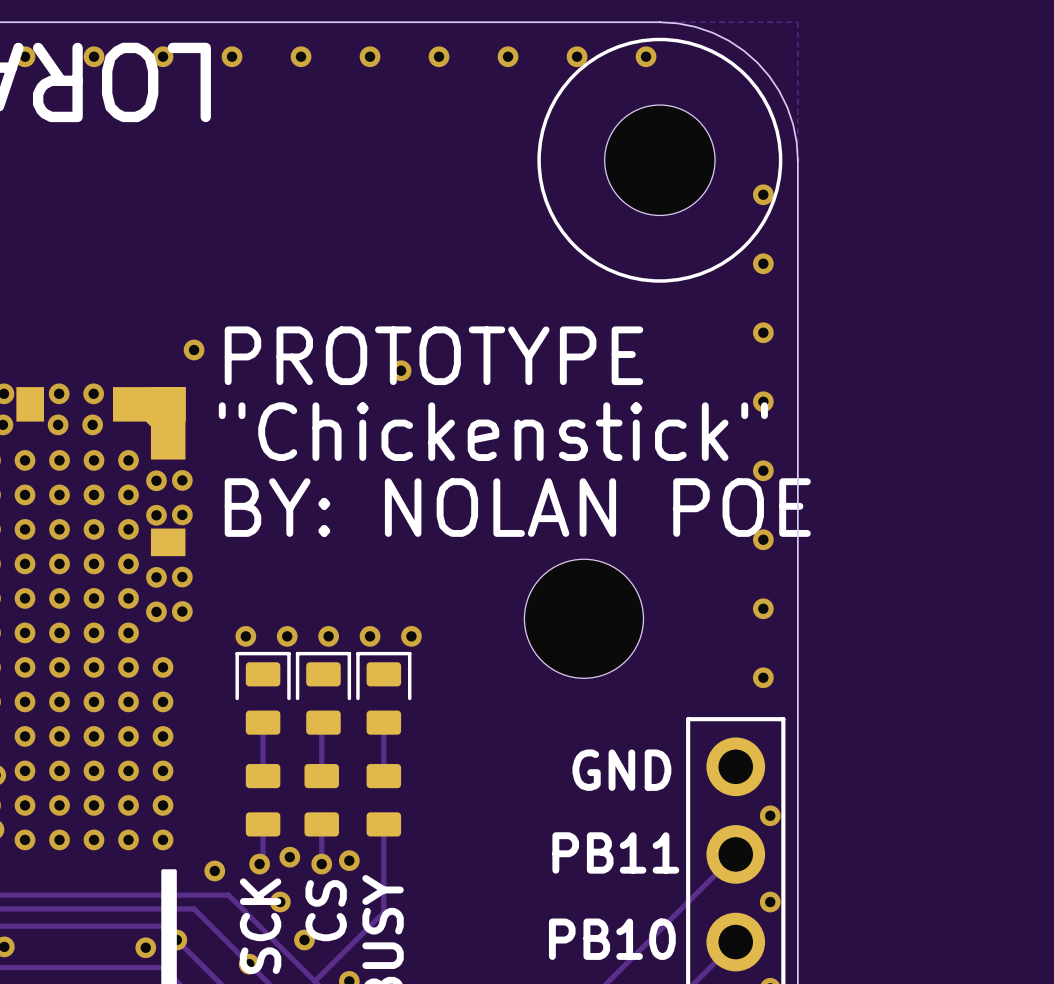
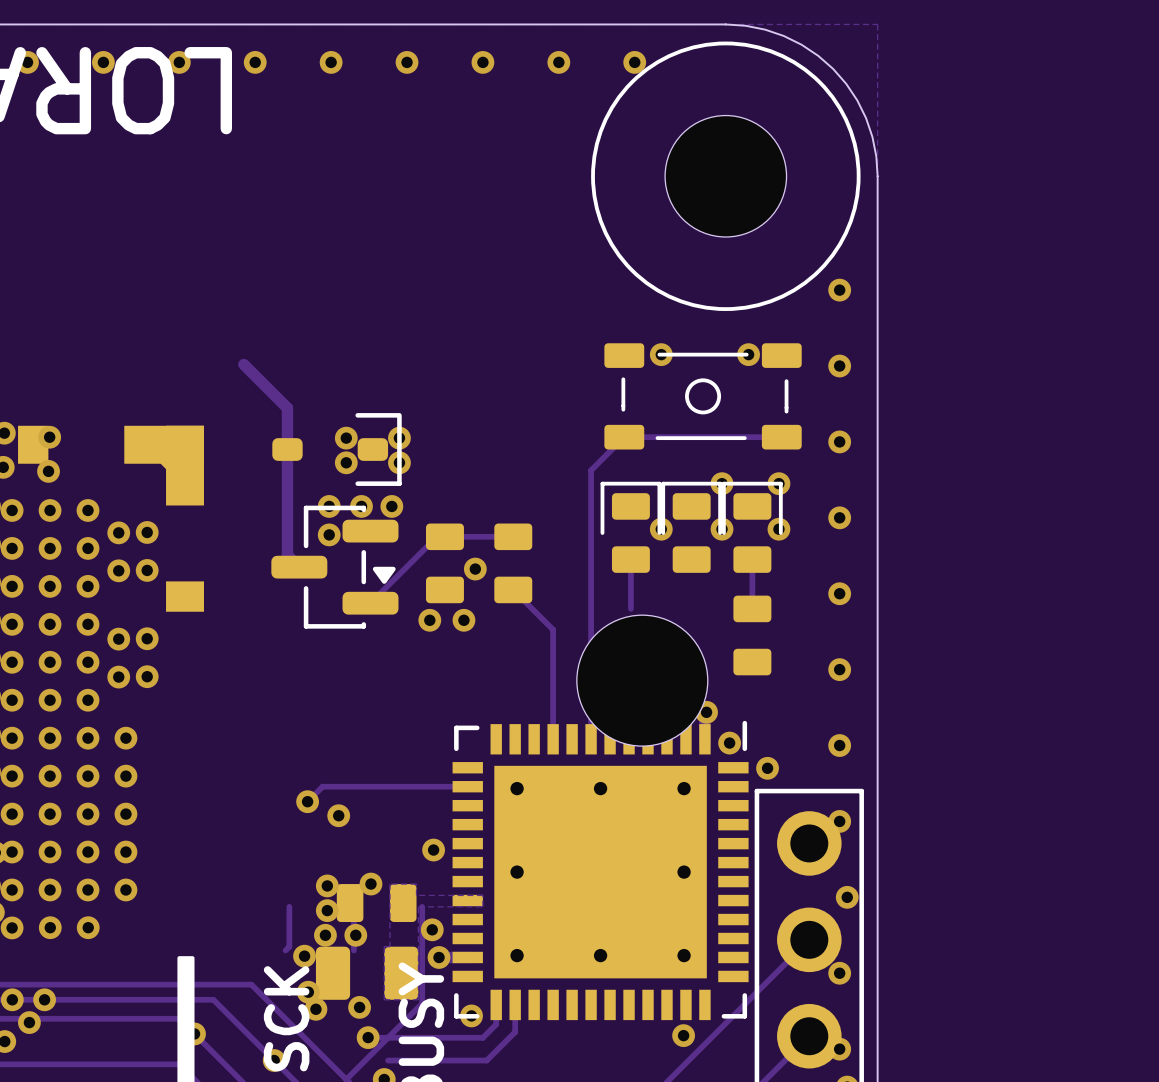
via: (646, 56) -> none
via: (763, 194) -> none
via: none -> (661, 354)
via: none -> (748, 354)
track: none -> (243, 364) (287, 408) (287, 555) (299, 567)
via: (194, 350) -> none
text: PROTOTYPE (433, 355) -> none
part: none -> (703, 396)
via: (401, 370) -> none
via position: (59, 393) -> (49, 437)
via: (93, 393) -> none
track: none -> (781, 437) (624, 437) (591, 470) (591, 744)
via: none -> (346, 438)
via: none -> (399, 438)
part: none -> (337, 449)
via: none -> (346, 462)
via: none -> (399, 462)
via position: (58, 424) -> (48, 471)
via: (92, 424) -> none
text: "Chickenstick" (493, 431) -> none
via: none -> (722, 483)
via: none -> (778, 483)
via: (25, 460) -> none
via: (59, 460) -> none
via: (94, 460) -> none
via: (128, 460) -> none
via: none -> (329, 506)
via: none -> (361, 506)
via: none -> (391, 506)
via: none -> (12, 510)
via: none -> (50, 510)
via: none -> (88, 510)
part: none -> (630, 527)
part: none -> (691, 527)
part: none -> (752, 527)
via: (156, 480) -> none
via: (182, 480) -> none
via: none -> (661, 529)
via: none -> (722, 529)
via: none -> (778, 529)
via: none -> (118, 532)
via: none -> (147, 532)
via: none -> (329, 534)
track: none -> (513, 536) (436, 536) (370, 603)
via: (25, 494) -> none
via: (59, 494) -> none
via: (94, 494) -> none
via: (128, 494) -> none
via: none -> (12, 548)
via: none -> (50, 548)
via: none -> (88, 548)
text: BY: NOLAN POE (517, 507) -> none
track: none -> (630, 559) (630, 608)
track: none -> (752, 559) (752, 608)
part: none -> (444, 563)
part: none -> (513, 563)
via: (182, 514) -> none
via: (156, 515) -> none
part: none -> (334, 567)
via: none -> (475, 569)
via: none -> (118, 570)
via: none -> (147, 570)
via: (25, 529) -> none
via: (59, 529) -> none
via: (94, 529) -> none
via: (128, 529) -> none
via: none -> (12, 586)
via: none -> (50, 586)
via: none -> (88, 586)
track: none -> (513, 589) (553, 629) (553, 744)
via: (25, 563) -> none
via: (59, 563) -> none
via: (94, 563) -> none
via: (128, 563) -> none
via: none -> (429, 620)
via: none -> (463, 620)
via: none -> (12, 624)
via: none -> (50, 624)
via: none -> (88, 624)
via: (156, 577) -> none
via: (182, 577) -> none
part: none -> (752, 635)
via: none -> (147, 638)
via: none -> (118, 639)
via: (25, 598) -> none
via: (59, 598) -> none
via: (94, 598) -> none
via: (128, 598) -> none
via: none -> (12, 662)
via: none -> (50, 662)
via: none -> (88, 662)
via: (156, 611) -> none
via: (182, 611) -> none
via: none -> (118, 677)
via: none -> (147, 676)
via: (25, 632) -> none
via: (59, 632) -> none
via: (94, 632) -> none
via: (128, 632) -> none
via: none -> (12, 700)
via: none -> (50, 700)
via: none -> (88, 700)
via: (245, 636) -> none
via: (287, 636) -> none
via: (328, 636) -> none
via: (370, 636) -> none
via: (411, 636) -> none
via: none -> (706, 712)
via: (25, 667) -> none
via: (59, 667) -> none
via: (94, 667) -> none
via: (128, 667) -> none
via: (163, 667) -> none
via: none -> (12, 738)
via: none -> (50, 738)
via: none -> (88, 738)
via: none -> (125, 738)
via: none -> (729, 743)
part: (263, 693) -> none
part: (323, 693) -> none
part: (383, 693) -> none
via: none -> (767, 768)
via: (25, 701) -> none
via: (59, 701) -> none
via: (94, 701) -> none
via: (128, 701) -> none
via: (163, 701) -> none
via: none -> (12, 776)
via: none -> (50, 776)
via: none -> (88, 776)
via: none -> (125, 776)
track: none -> (472, 786) (322, 786) (307, 801)
track: (263, 722) (263, 776) -> none
track: (383, 722) (383, 776) -> none
track: (321, 724) (321, 776) -> none
via: none -> (307, 801)
via: (25, 736) -> none
via: (59, 736) -> none
via: (94, 736) -> none
via: (128, 736) -> none
via: (163, 736) -> none
via: none -> (12, 814)
via: none -> (50, 814)
via: none -> (88, 814)
via: none -> (125, 814)
via: none -> (338, 815)
via: none -> (839, 821)
via: (25, 770) -> none
via: (59, 770) -> none
via: (94, 770) -> none
via: (128, 770) -> none
via: (163, 770) -> none
text: GND (621, 770) -> none
via: none -> (433, 850)
via: none -> (12, 852)
via: none -> (50, 852)
via: none -> (88, 852)
via: none -> (125, 852)
part: none -> (600, 870)
part: (263, 800) -> none
part: (321, 800) -> none
part: (383, 800) -> none
via: none -> (370, 884)
zone outline: none -> (389, 884) (416, 884) (416, 895) (482, 895) (482, 906) (418, 906) (418, 999) (384, 999) (384, 946) (389, 946) (389, 884)
via: (25, 805) -> none
via: (59, 805) -> none
via: (94, 805) -> none
via: (128, 805) -> none
via: (163, 805) -> none
via: none -> (327, 885)
via: none -> (12, 889)
via: none -> (50, 889)
via: none -> (88, 889)
via: none -> (125, 889)
part: none -> (376, 903)
via: none -> (327, 910)
via: (25, 839) -> none
via: (59, 839) -> none
via: (94, 839) -> none
via: (128, 839) -> none
via: (163, 839) -> none
via: none -> (12, 927)
via: none -> (50, 927)
via: none -> (88, 927)
via: none -> (432, 929)
via: none -> (325, 935)
text: PB11 (615, 852) -> none
via: (289, 857) -> none
via: (349, 860) -> none
via: (259, 864) -> none
via position: (321, 864) -> (355, 935)
via: none -> (304, 956)
via: (214, 870) -> none
via: none -> (439, 957)
part: none -> (367, 973)
via position: (770, 902) -> (839, 973)
via: none -> (12, 999)
via: none -> (44, 999)
track: none -> (496, 1000) (496, 1024) (482, 1037) (368, 1037)
track: none -> (515, 1000) (515, 1032) (486, 1060) (388, 1060)
text: CS (326, 910) -> none
via: none -> (359, 1007)
via: none -> (315, 1009)
via: none -> (471, 1015)
via: none -> (29, 1022)
via: (304, 939) -> none
text: PB10 (612, 939) -> none
via: none -> (683, 1035)
via: none -> (368, 1037)
via: (145, 947) -> none
via: none -> (839, 1049)

